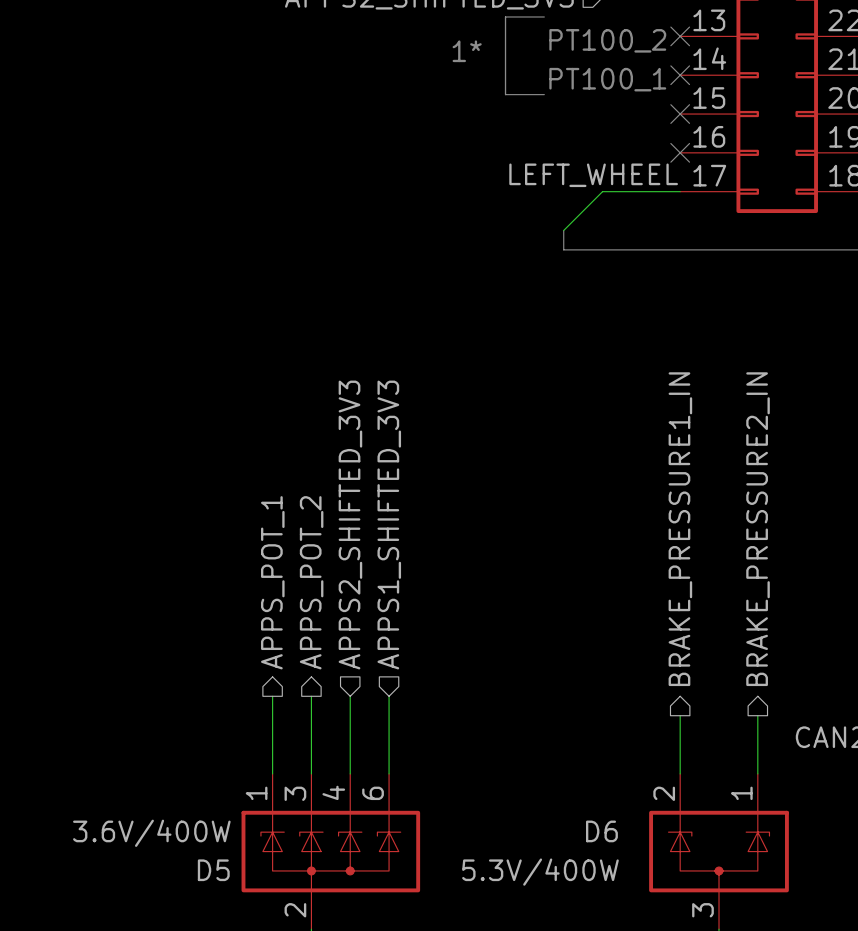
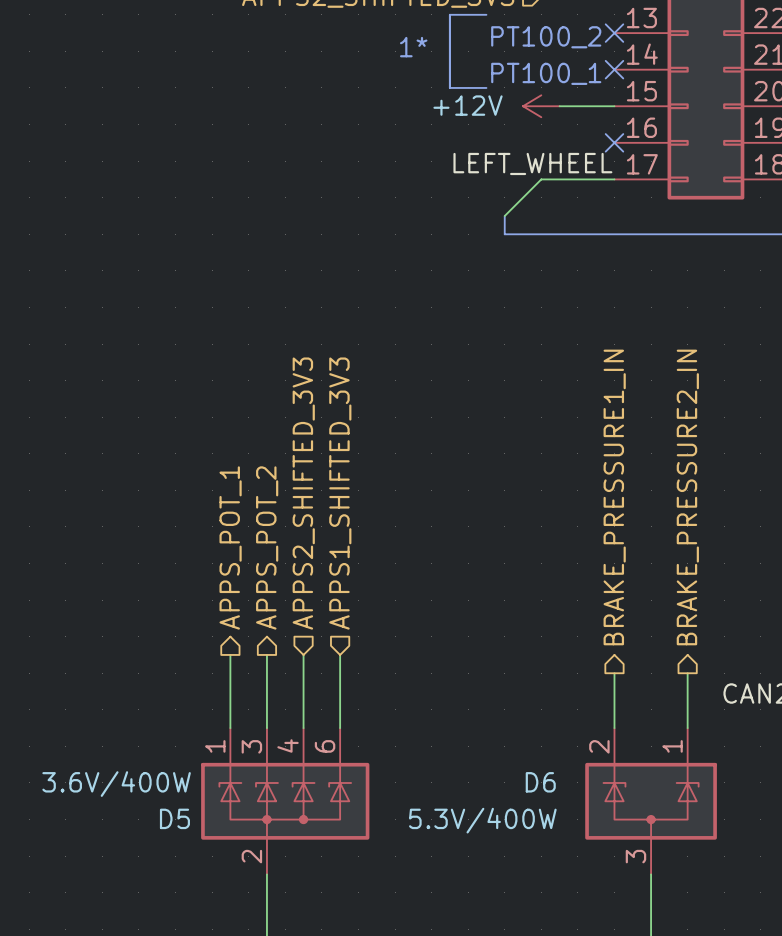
power symbol: none -> +12V (541, 106)
wire: none -> (559, 106) (614, 106)
no-connect mark: (680, 114) -> none

